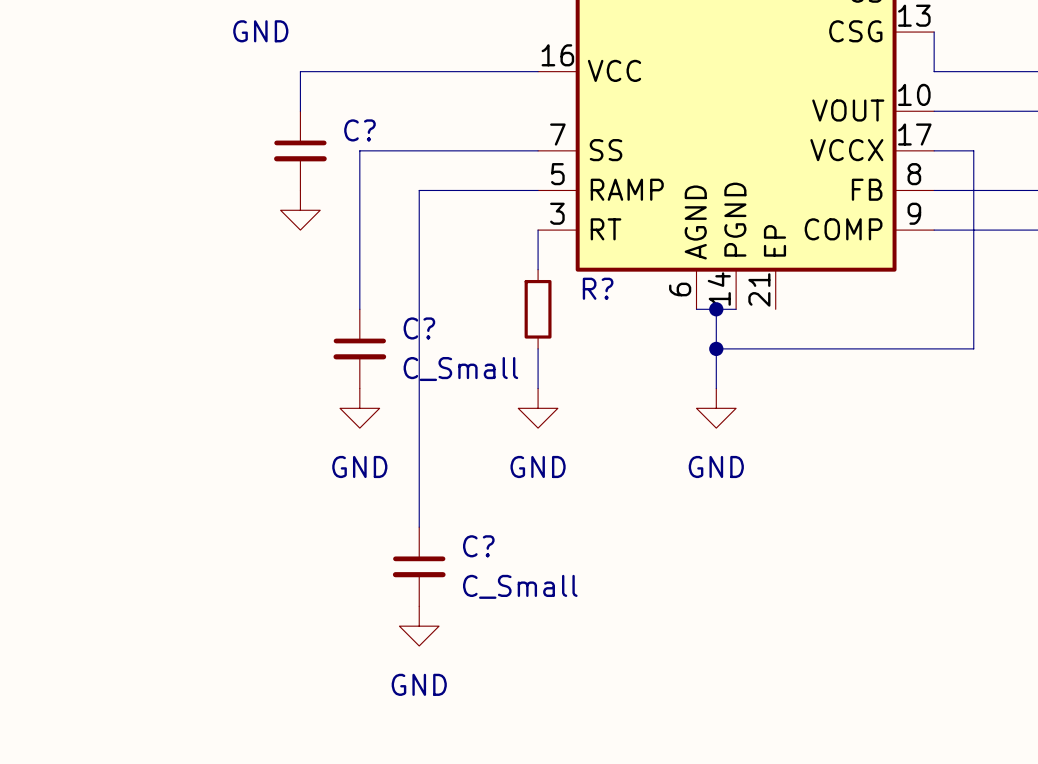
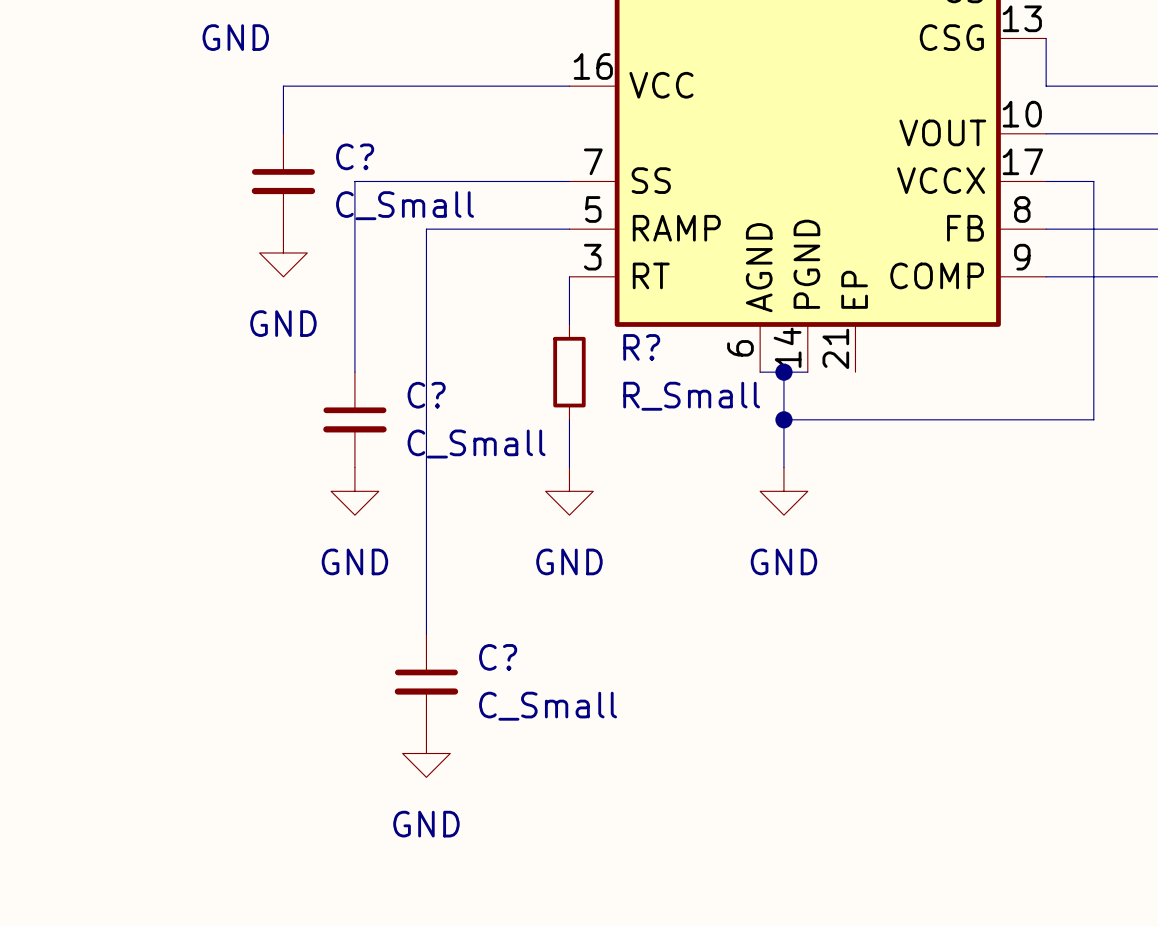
C? value: none -> C_Small (405, 205)
power symbol text: none -> GND (283, 323)
R? value: none -> R_Small (691, 396)

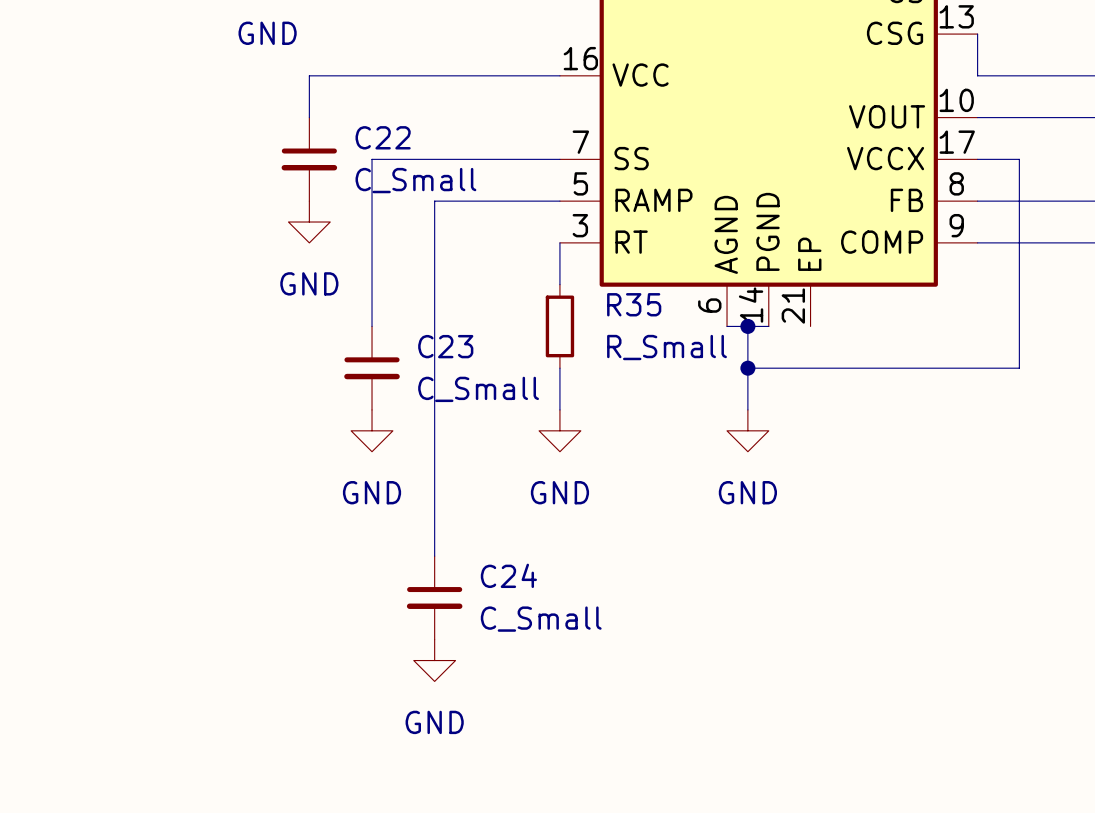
C? name: C? (355, 156) -> C22 (383, 137)
R? name: R? (641, 347) -> R35 (634, 304)
C? name: C? (426, 395) -> C23 (445, 346)
C? name: C? (498, 657) -> C24 (508, 575)

